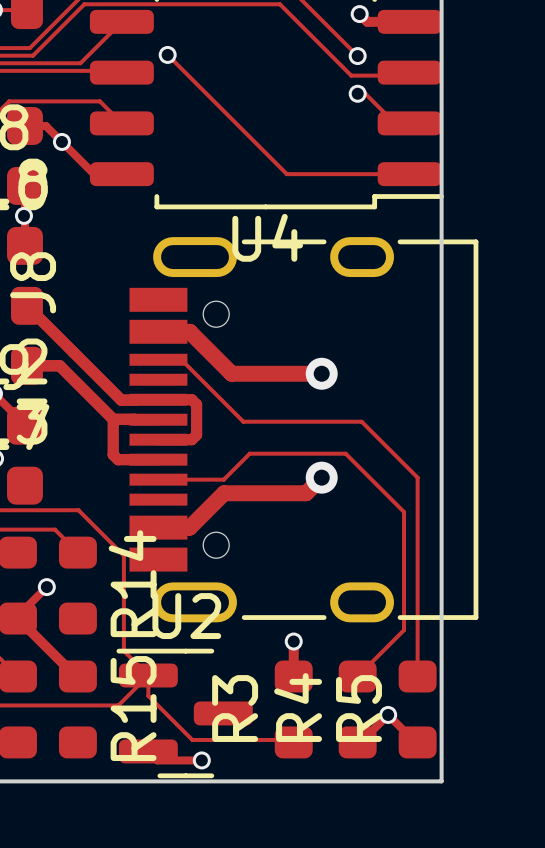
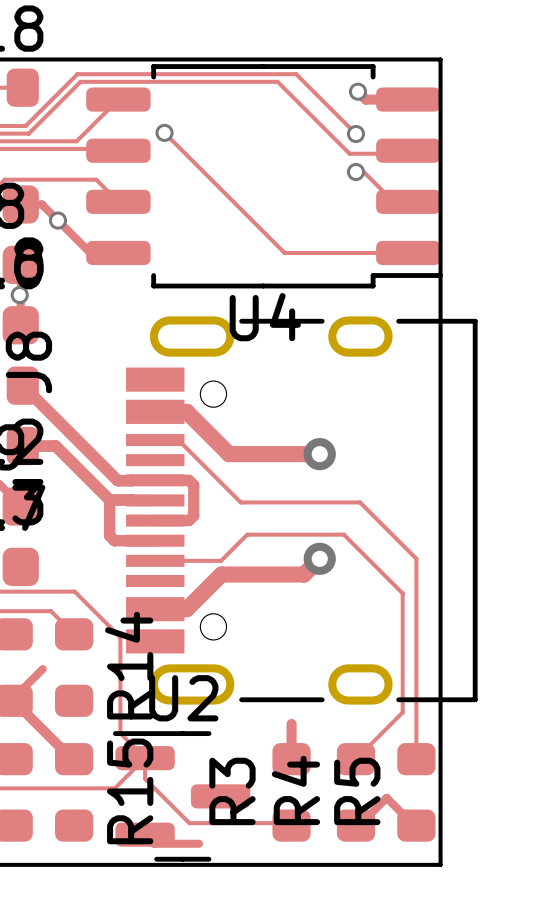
via: (46, 587) -> none
via: (293, 641) -> none
via: (388, 714) -> none
via: (201, 760) -> none

